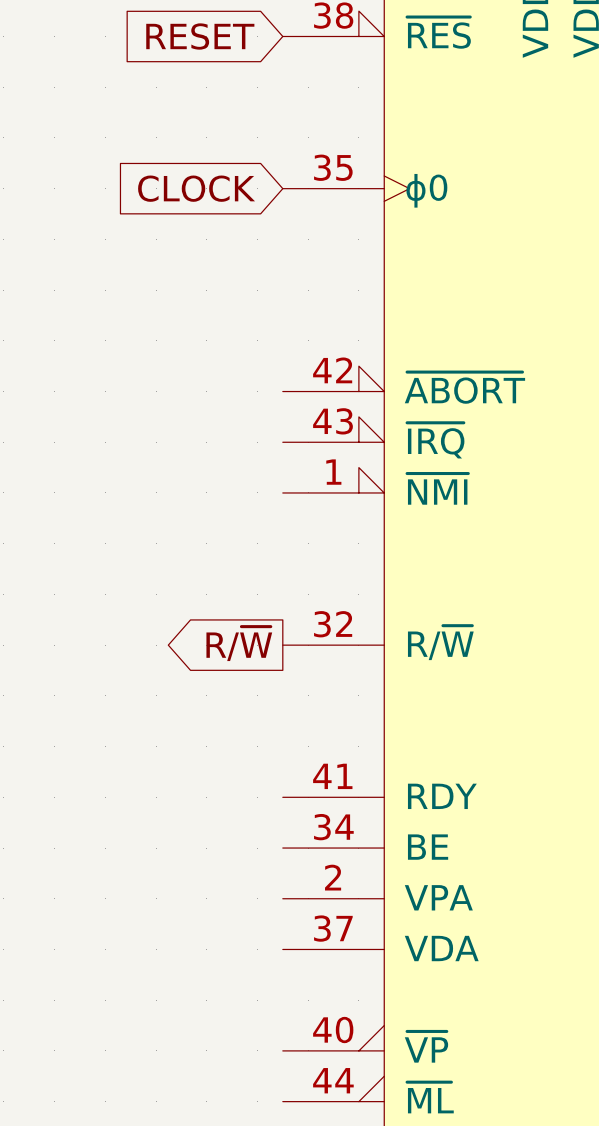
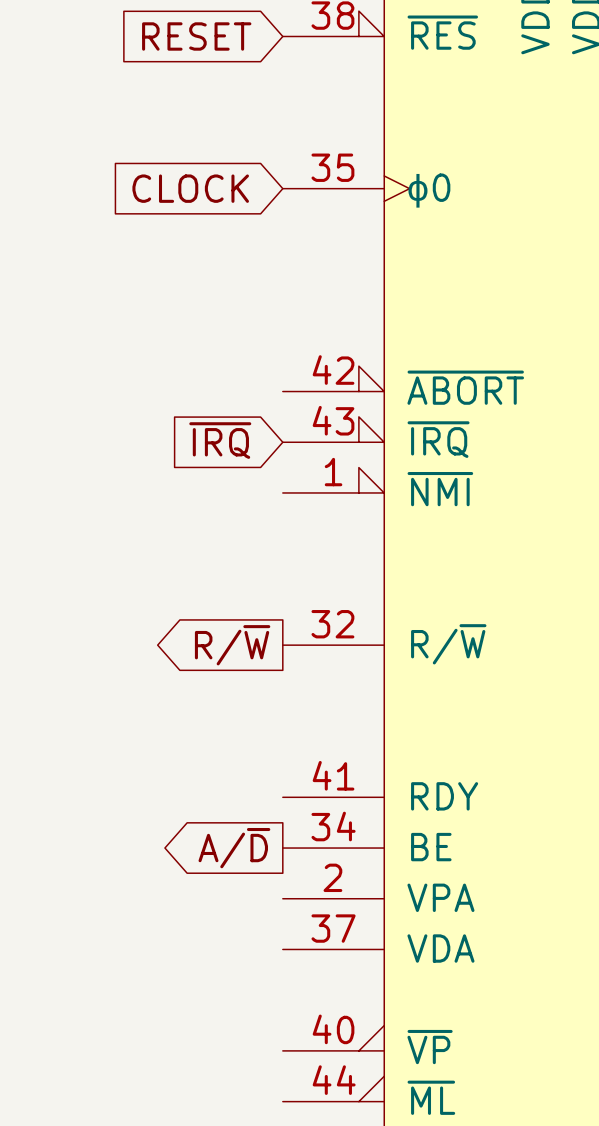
global label: none -> ~{IRQ} (220, 440)
global label: none -> A/~{D} (234, 848)

